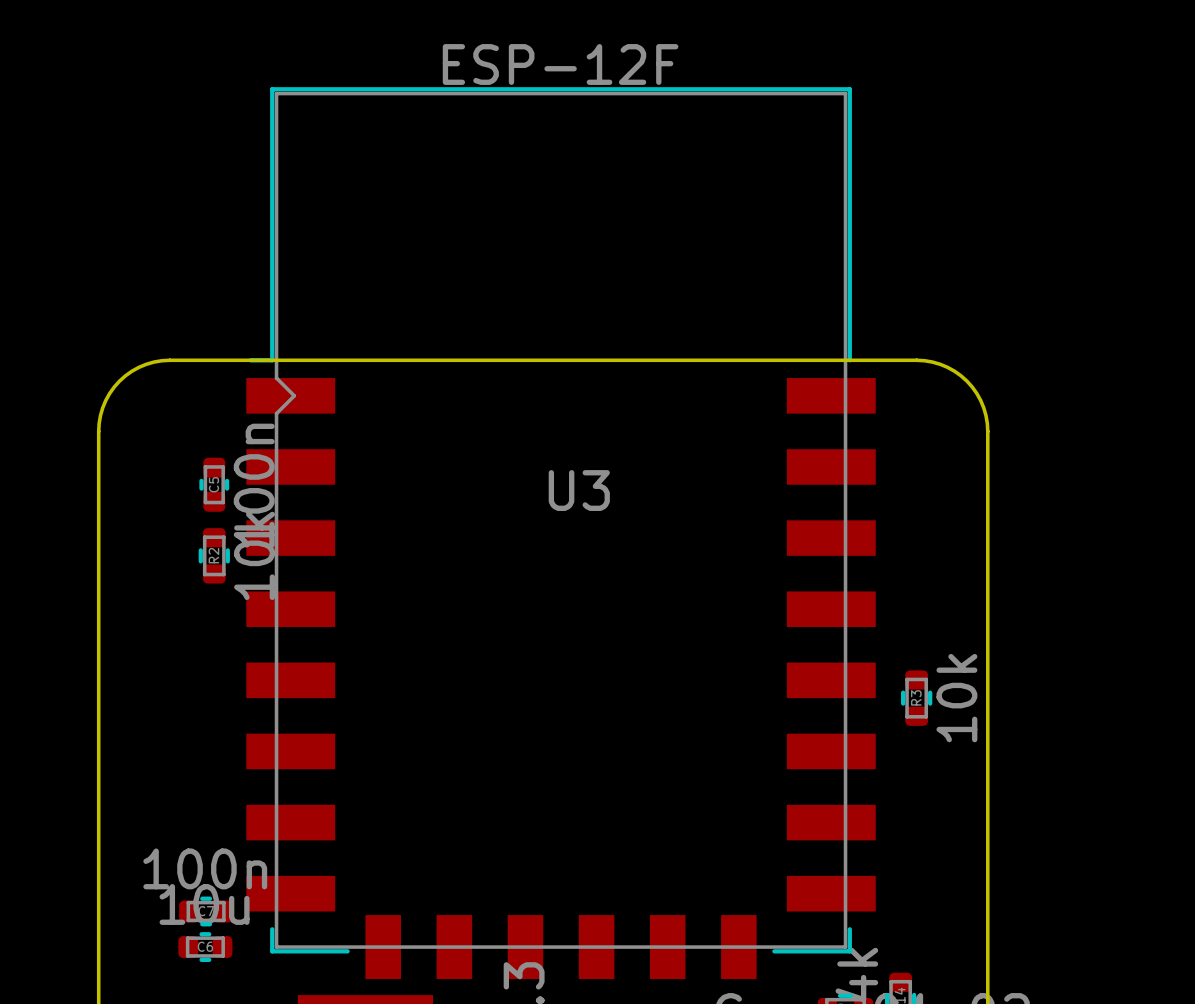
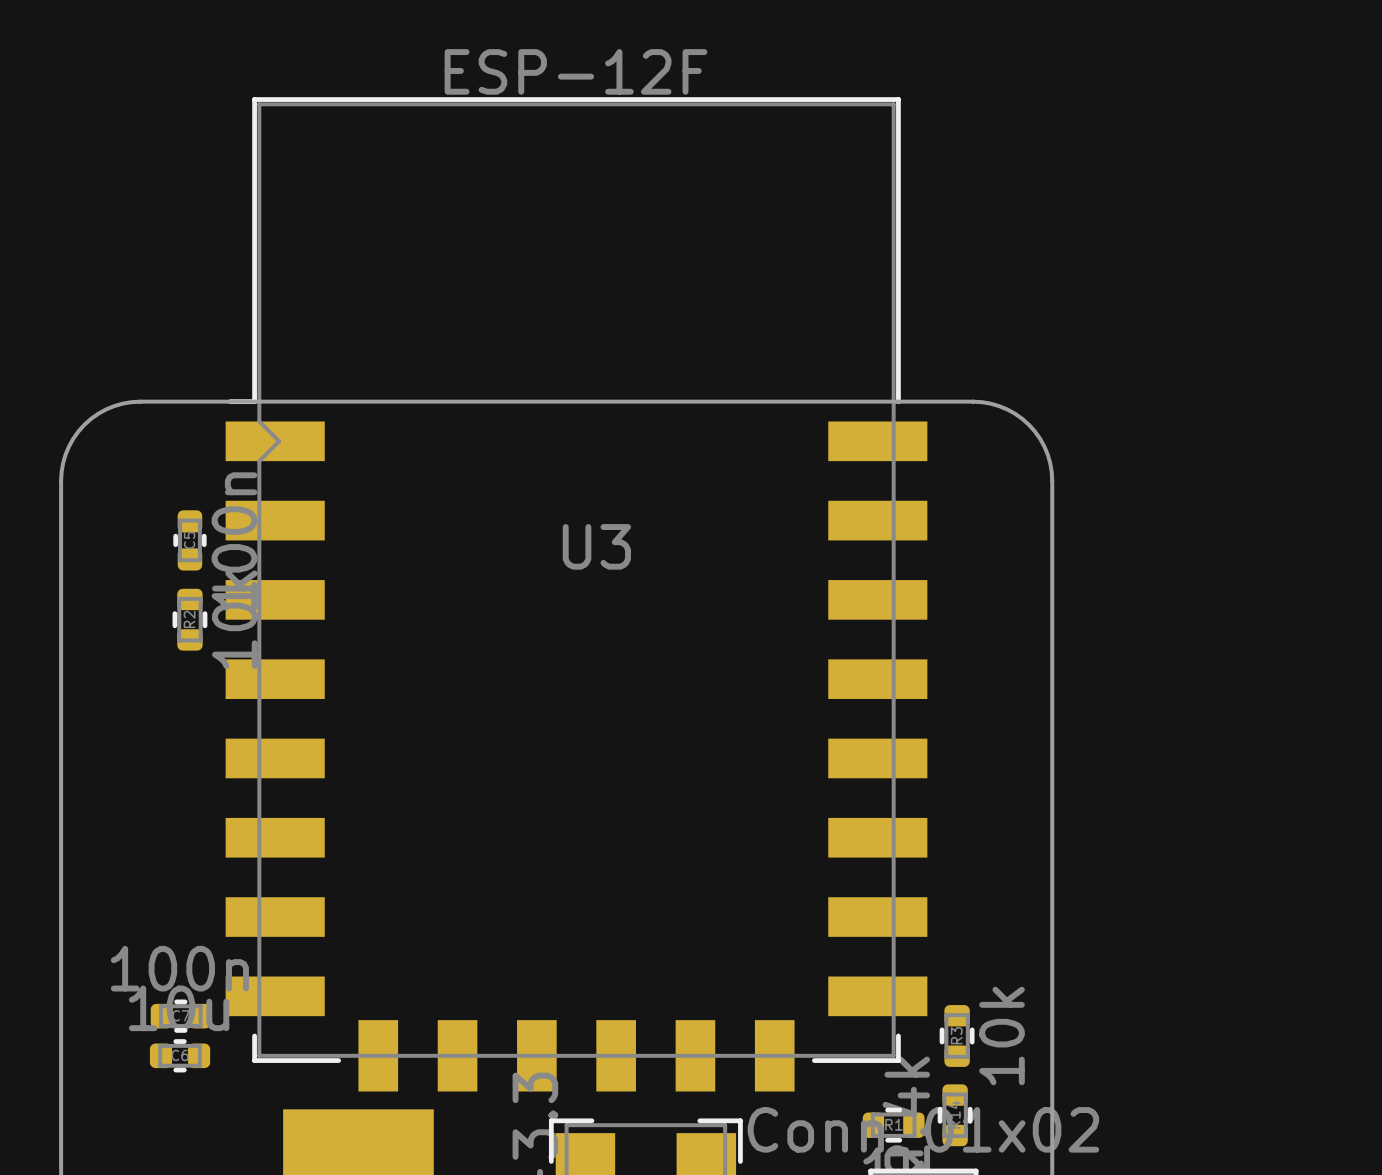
R3 position: (916, 698) -> (957, 1035)

